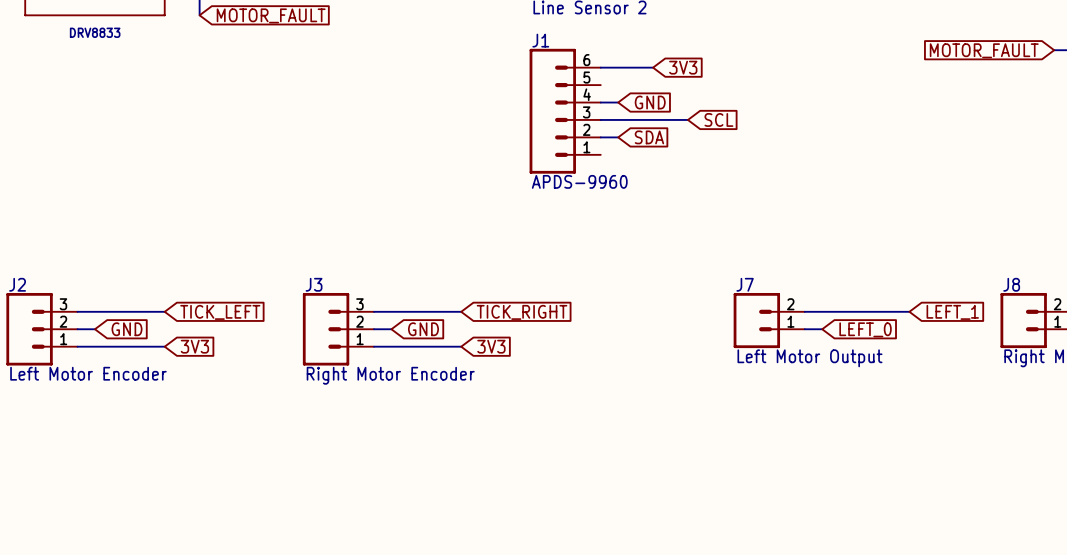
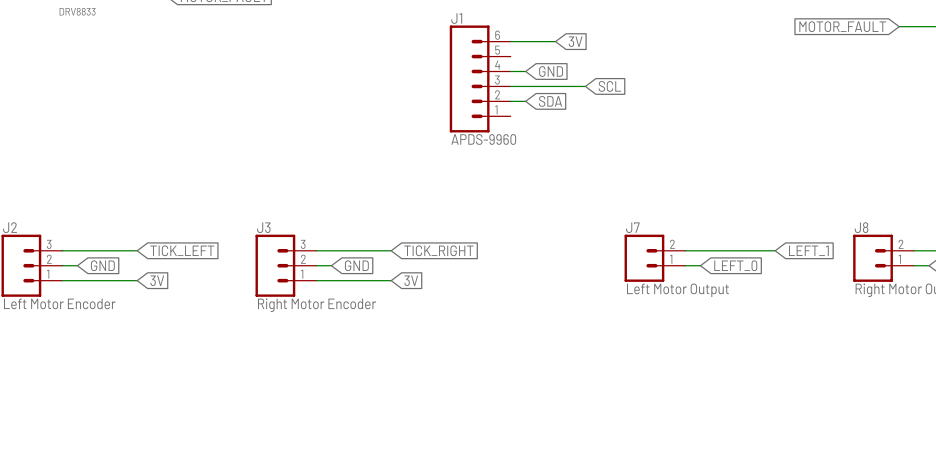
global label: 3V3 (683, 67) -> 3V (575, 41)
global label: 3V3 (194, 346) -> 3V (157, 280)
global label: 3V3 (491, 346) -> 3V (411, 280)

